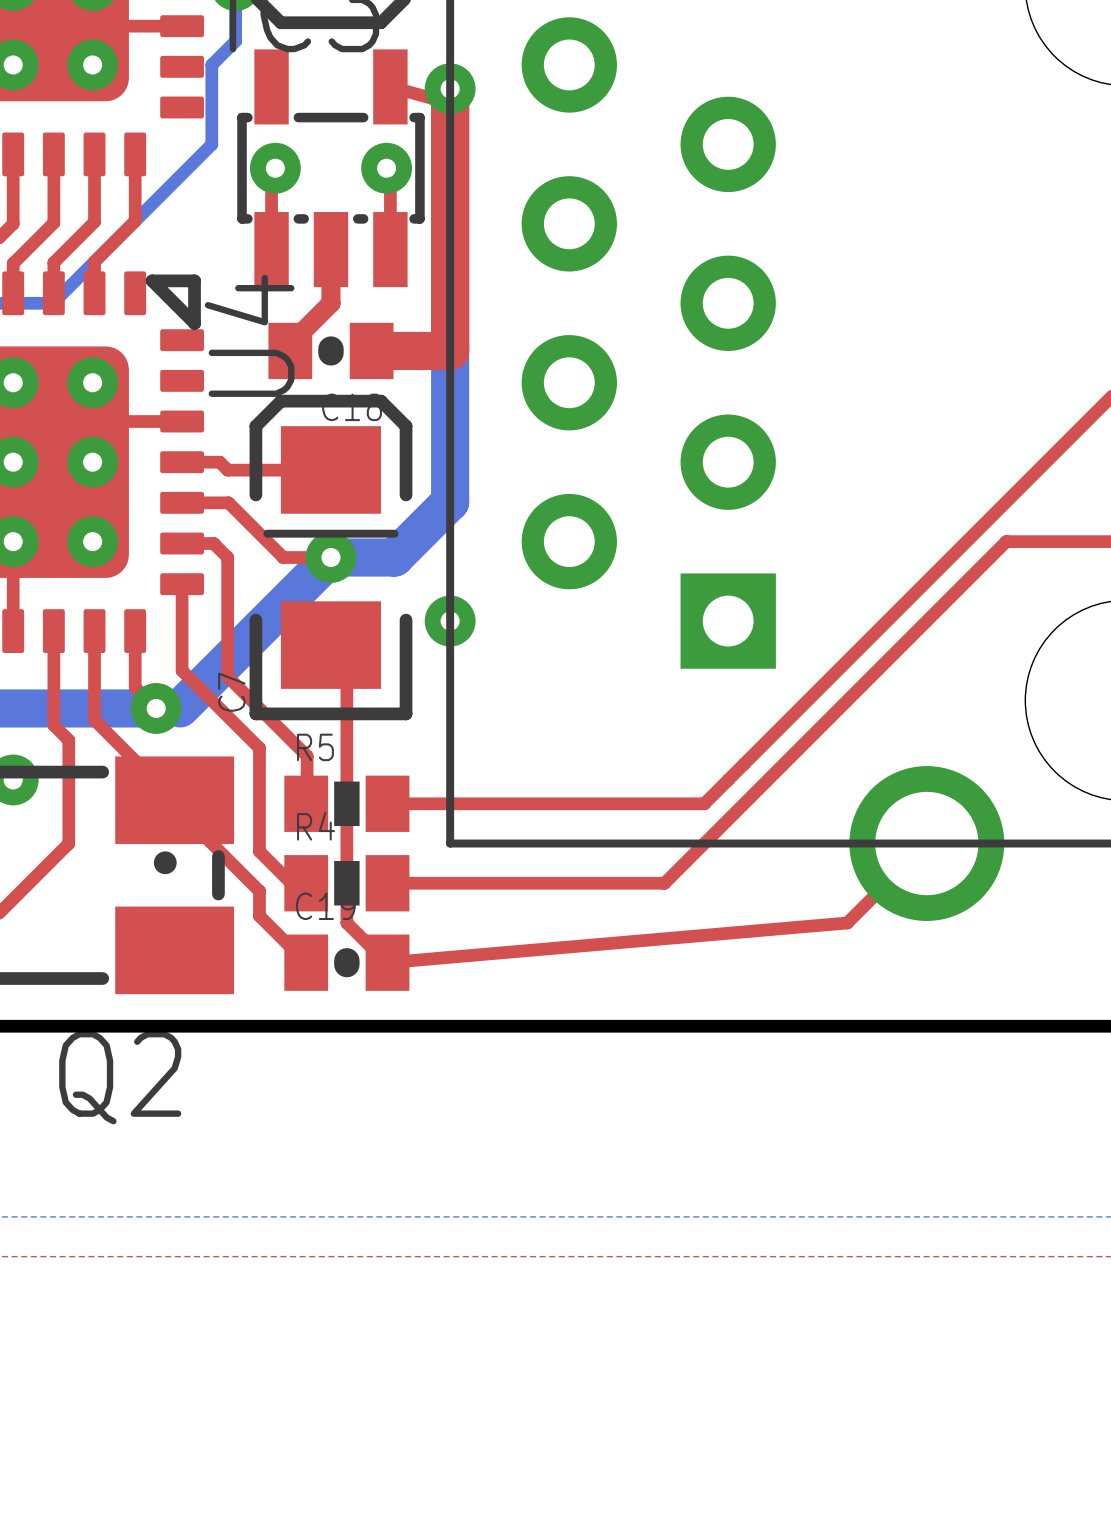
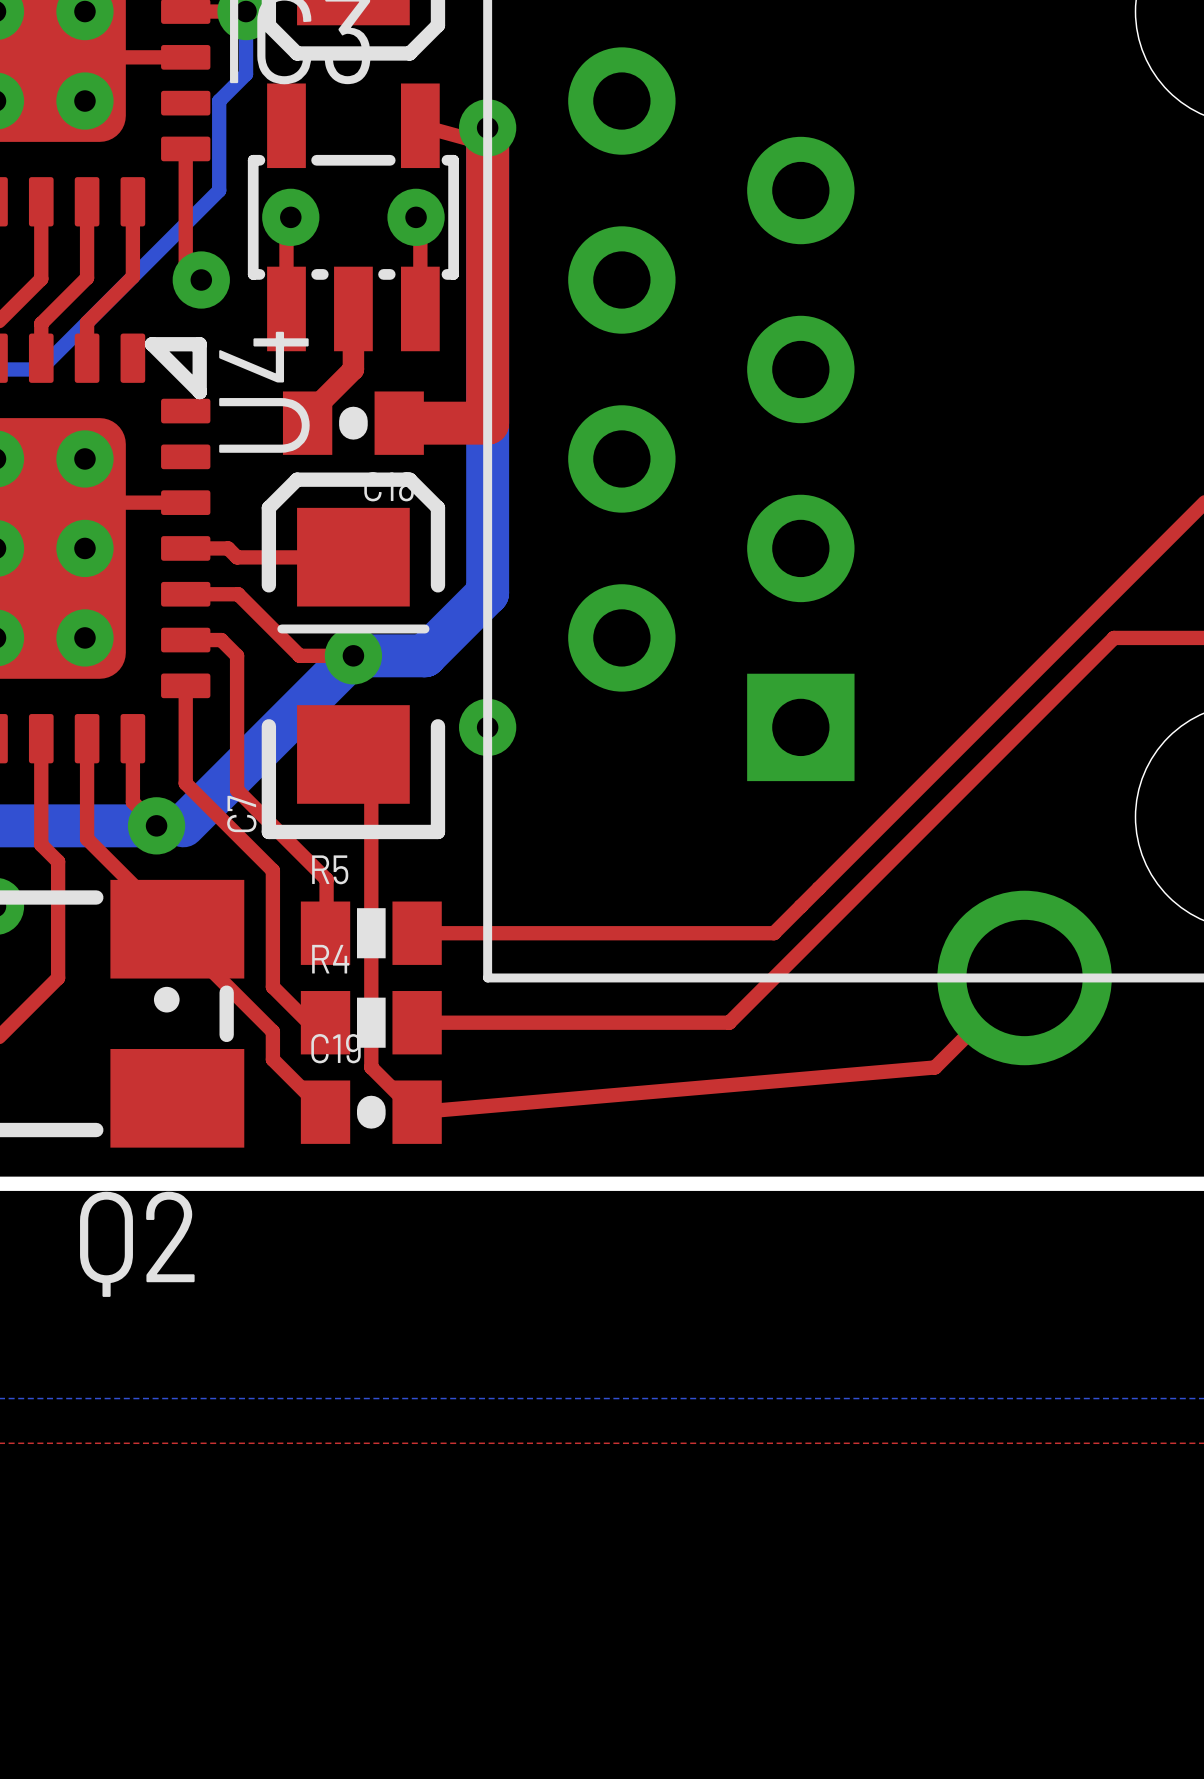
top track: none -> (185, 148) (185, 264) (201, 280)
via: none -> (201, 280)

